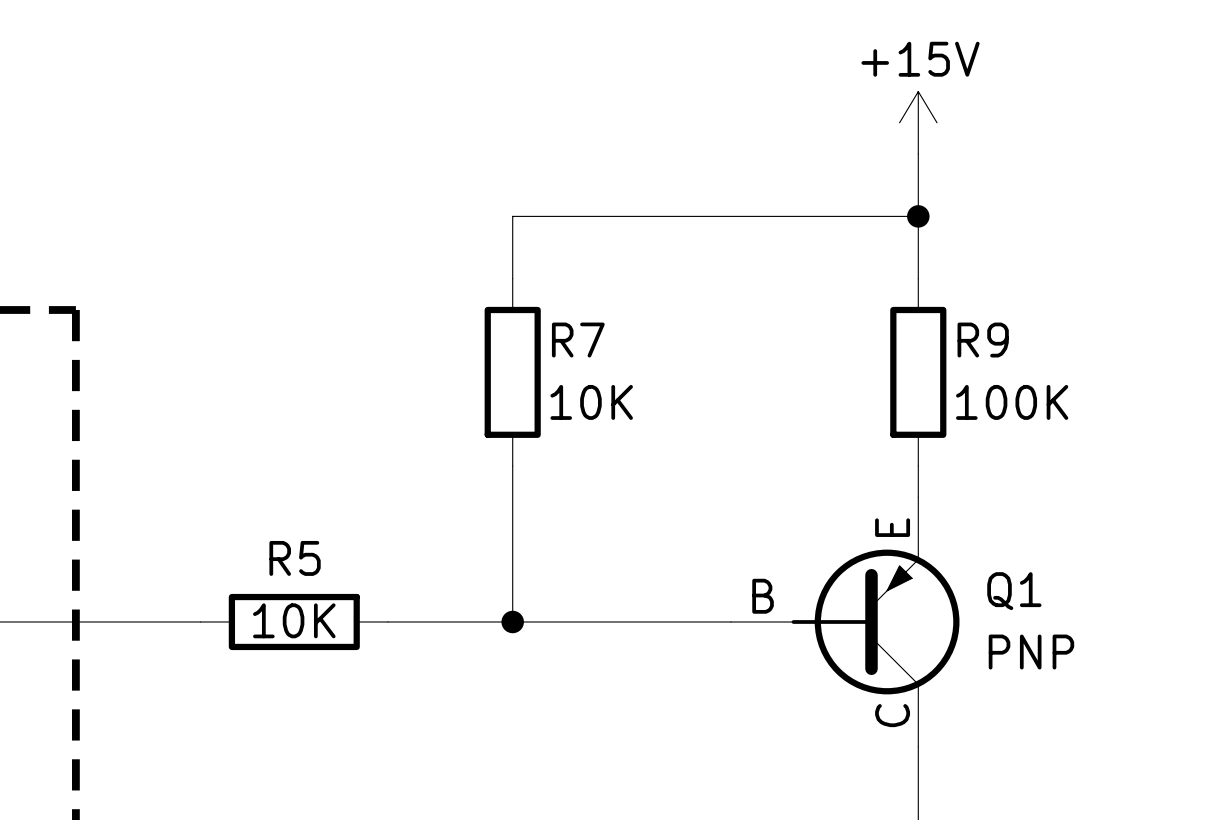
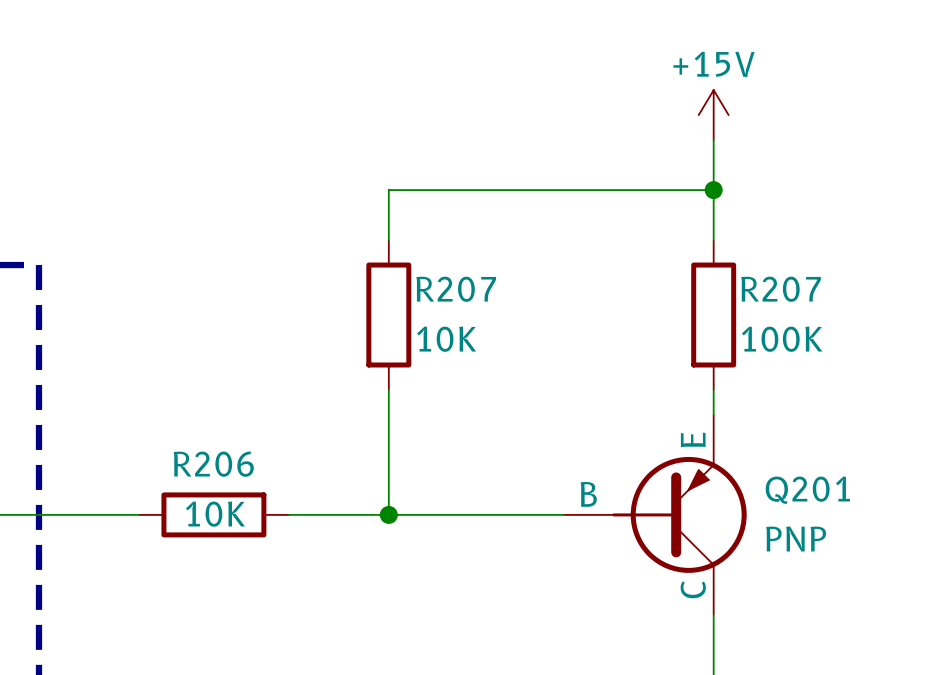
R7 name: R7 (578, 340) -> R207 (456, 289)
R9 name: R9 (983, 340) -> R207 (781, 289)
R5 name: R5 (295, 558) -> R206 (213, 464)
Q1 name: Q1 (1014, 591) -> Q201 (807, 490)

